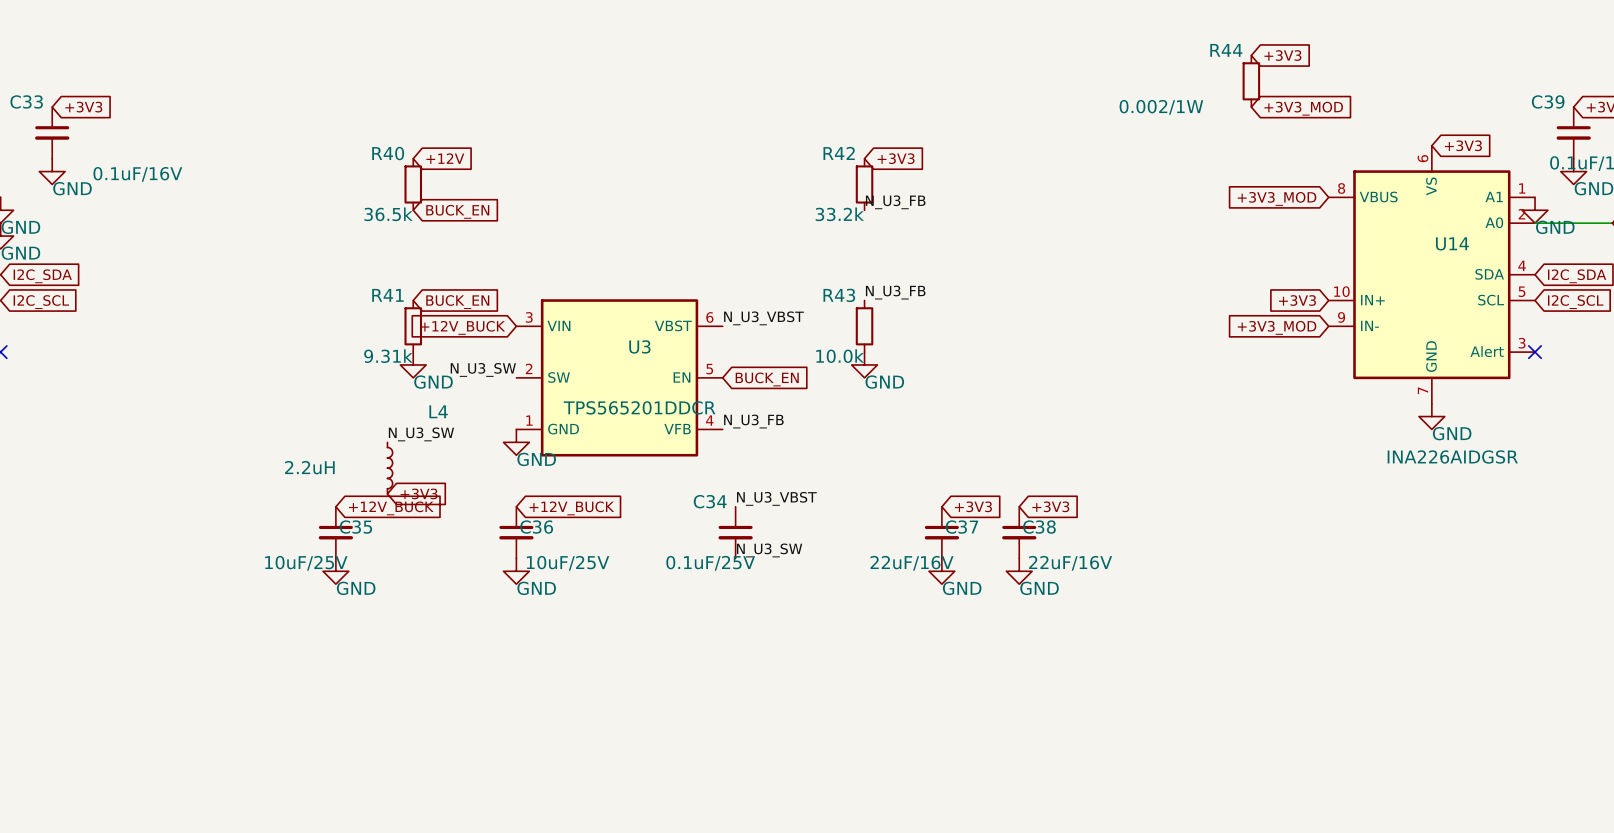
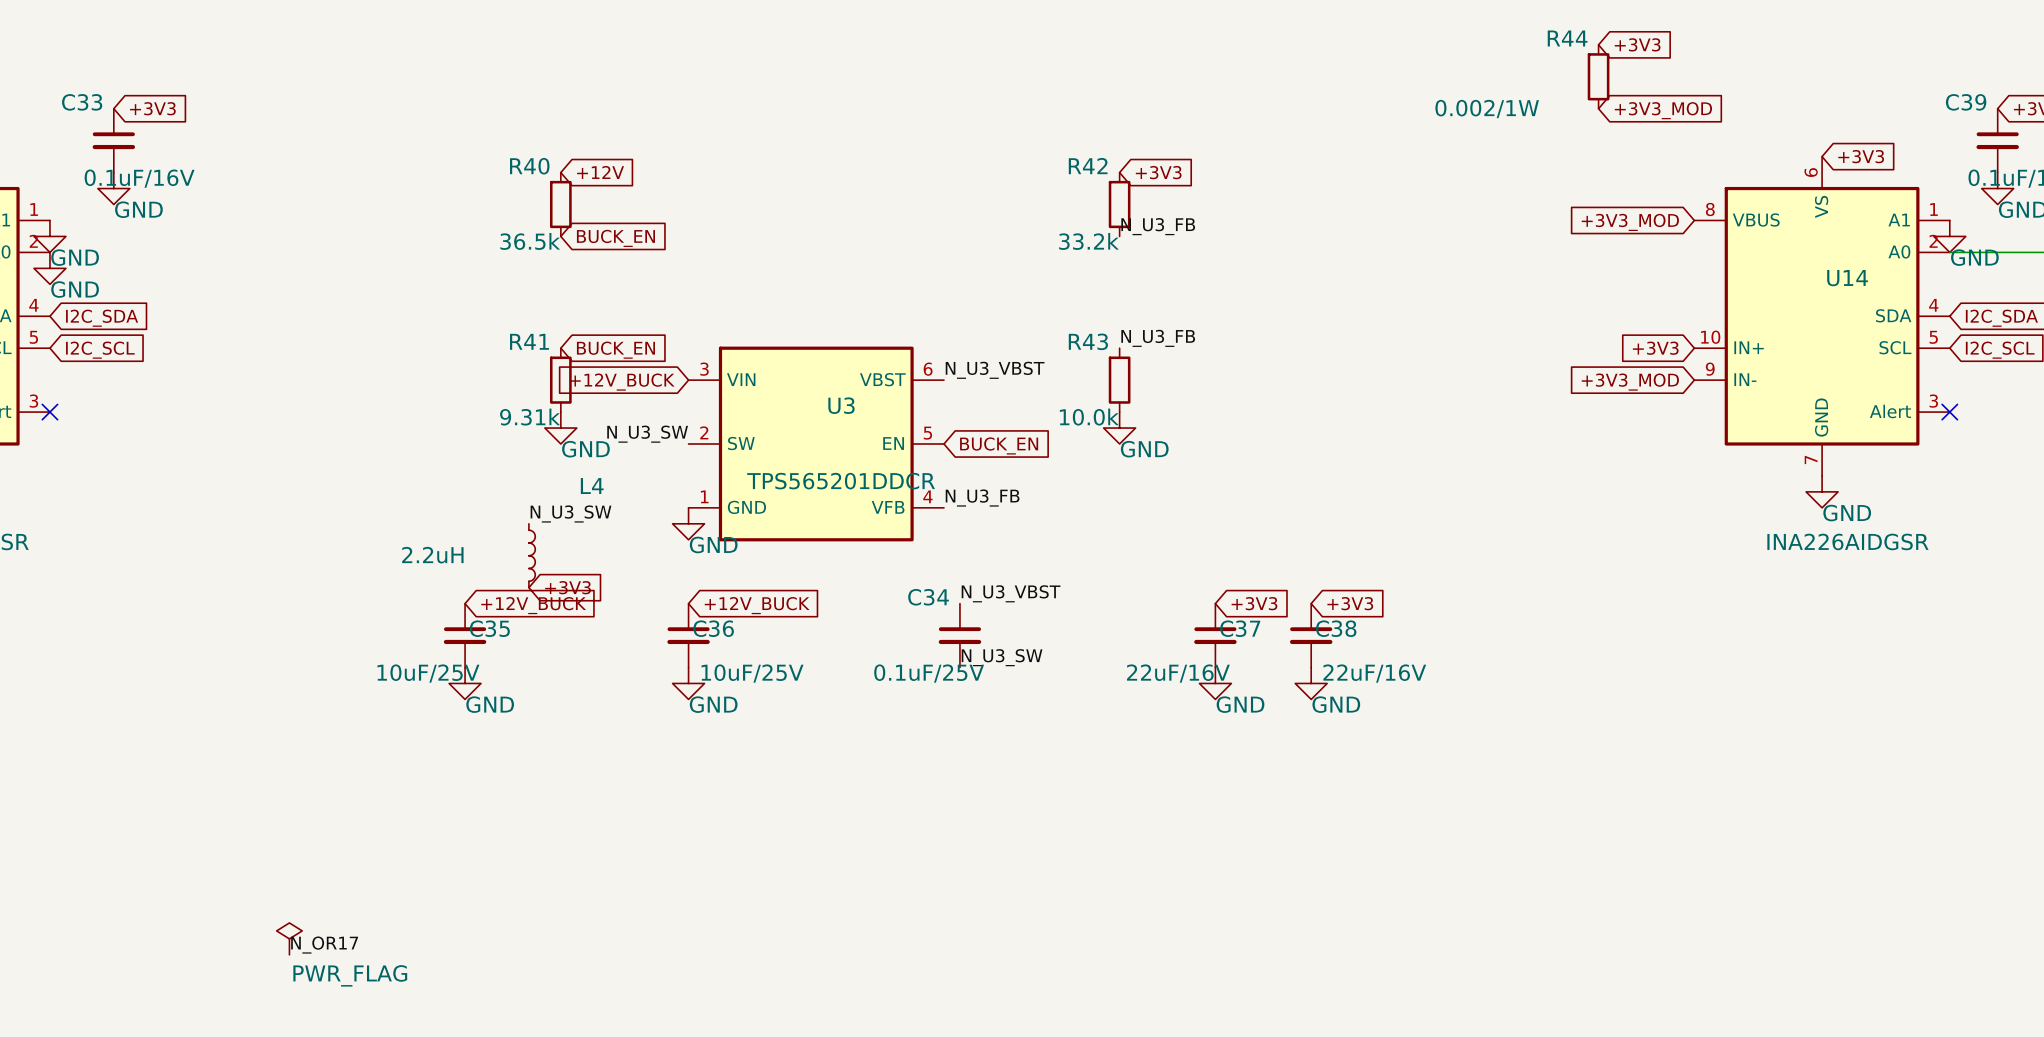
C33 value position: 0.1uF/16V (137, 174) -> 0.1uF/16V (139, 178)
power symbol: none -> PWR_FLAG (289, 938)
label: none -> N_OR17 (324, 945)

